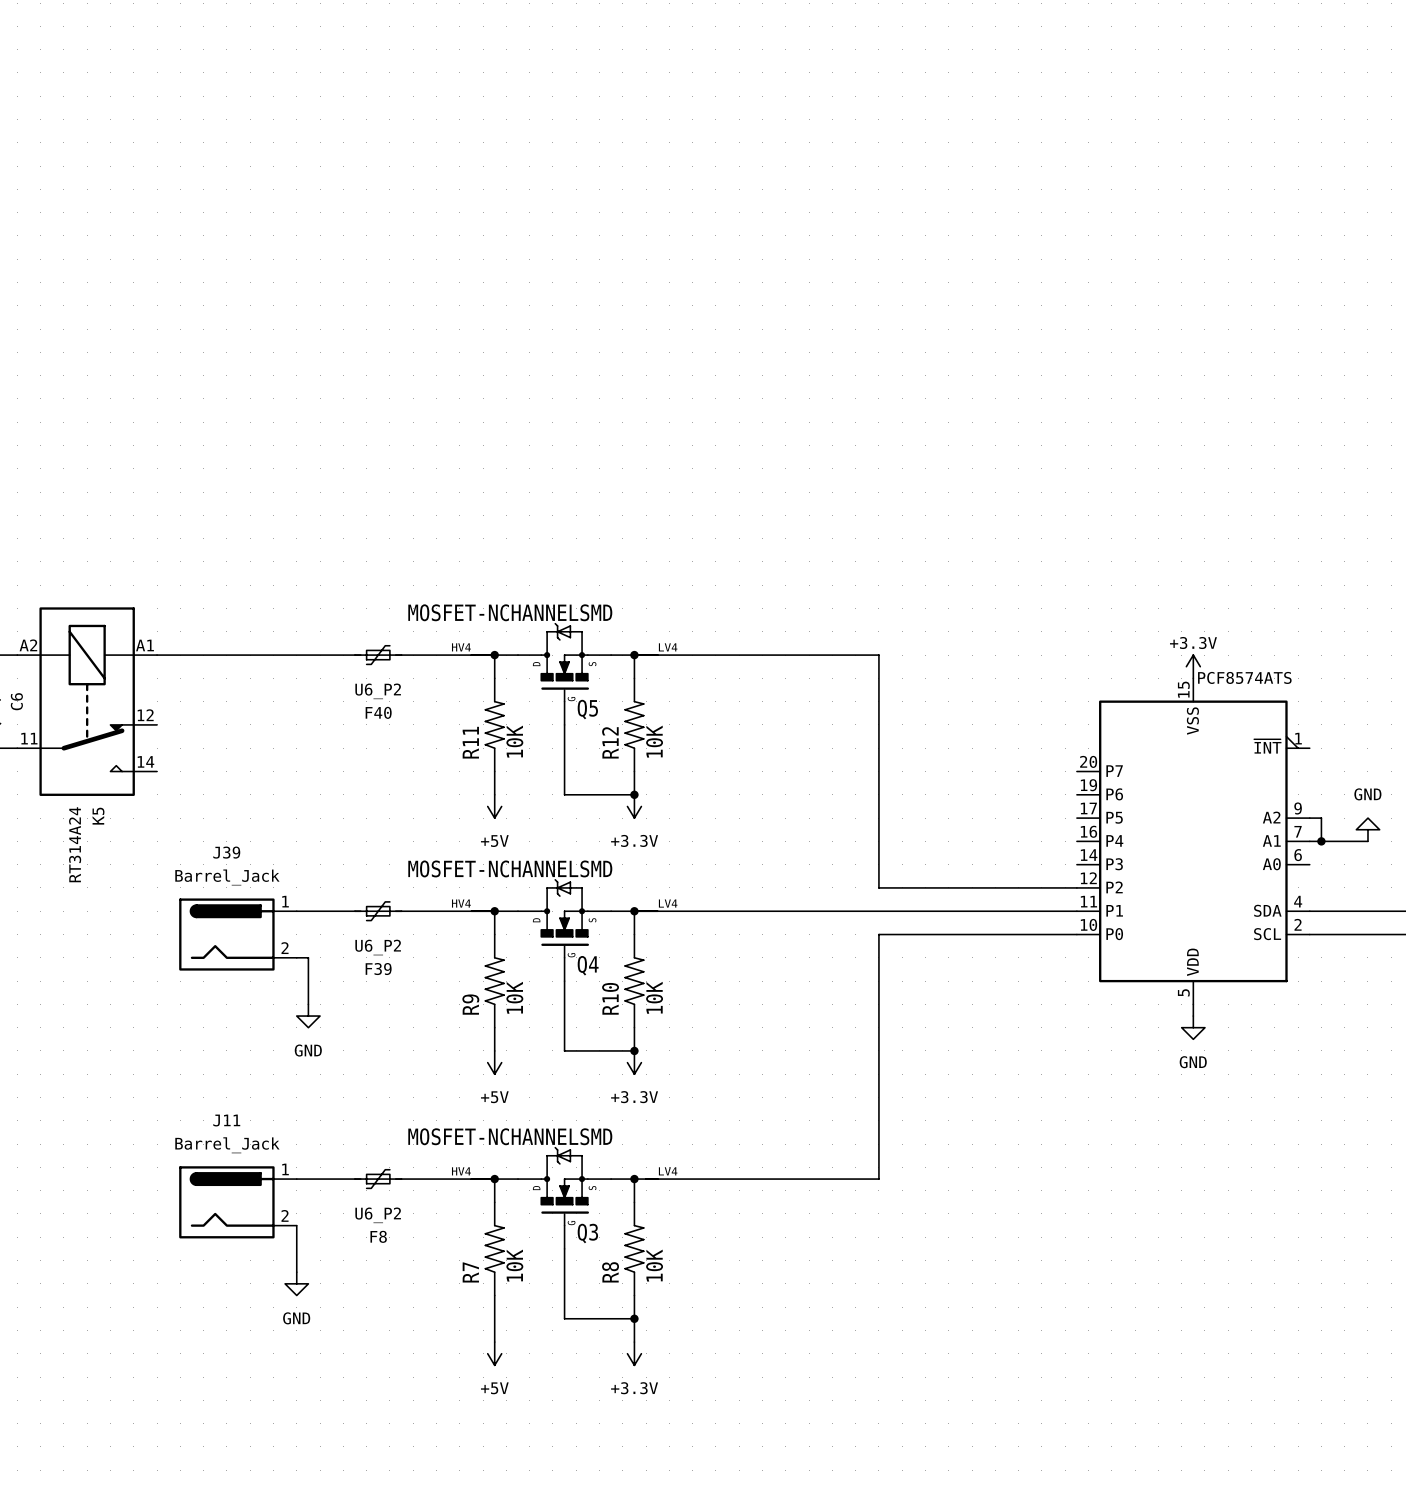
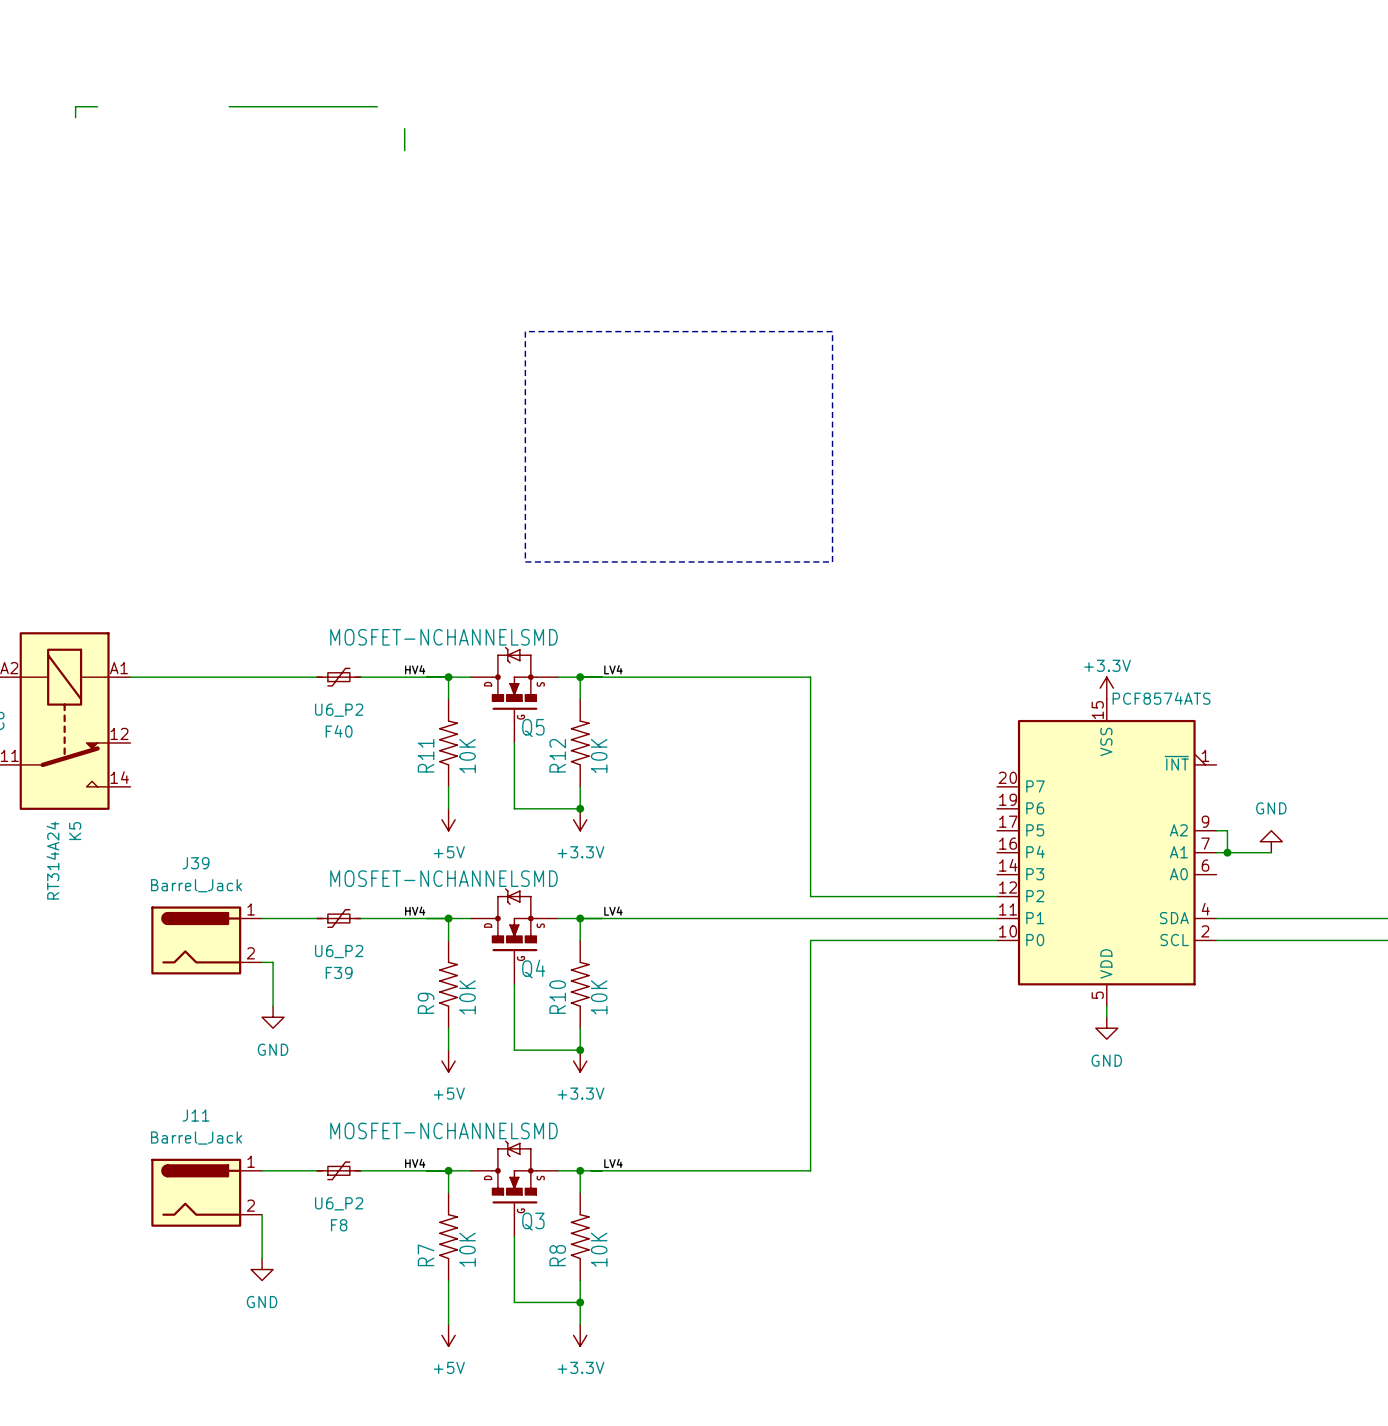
wire: none -> (97, 106) (75, 106) (75, 117)
wire: none -> (229, 106) (377, 106)
wire: none -> (404, 128) (404, 150)
line: none -> (525, 331) (525, 561) (832, 561) (832, 331) (525, 331)

